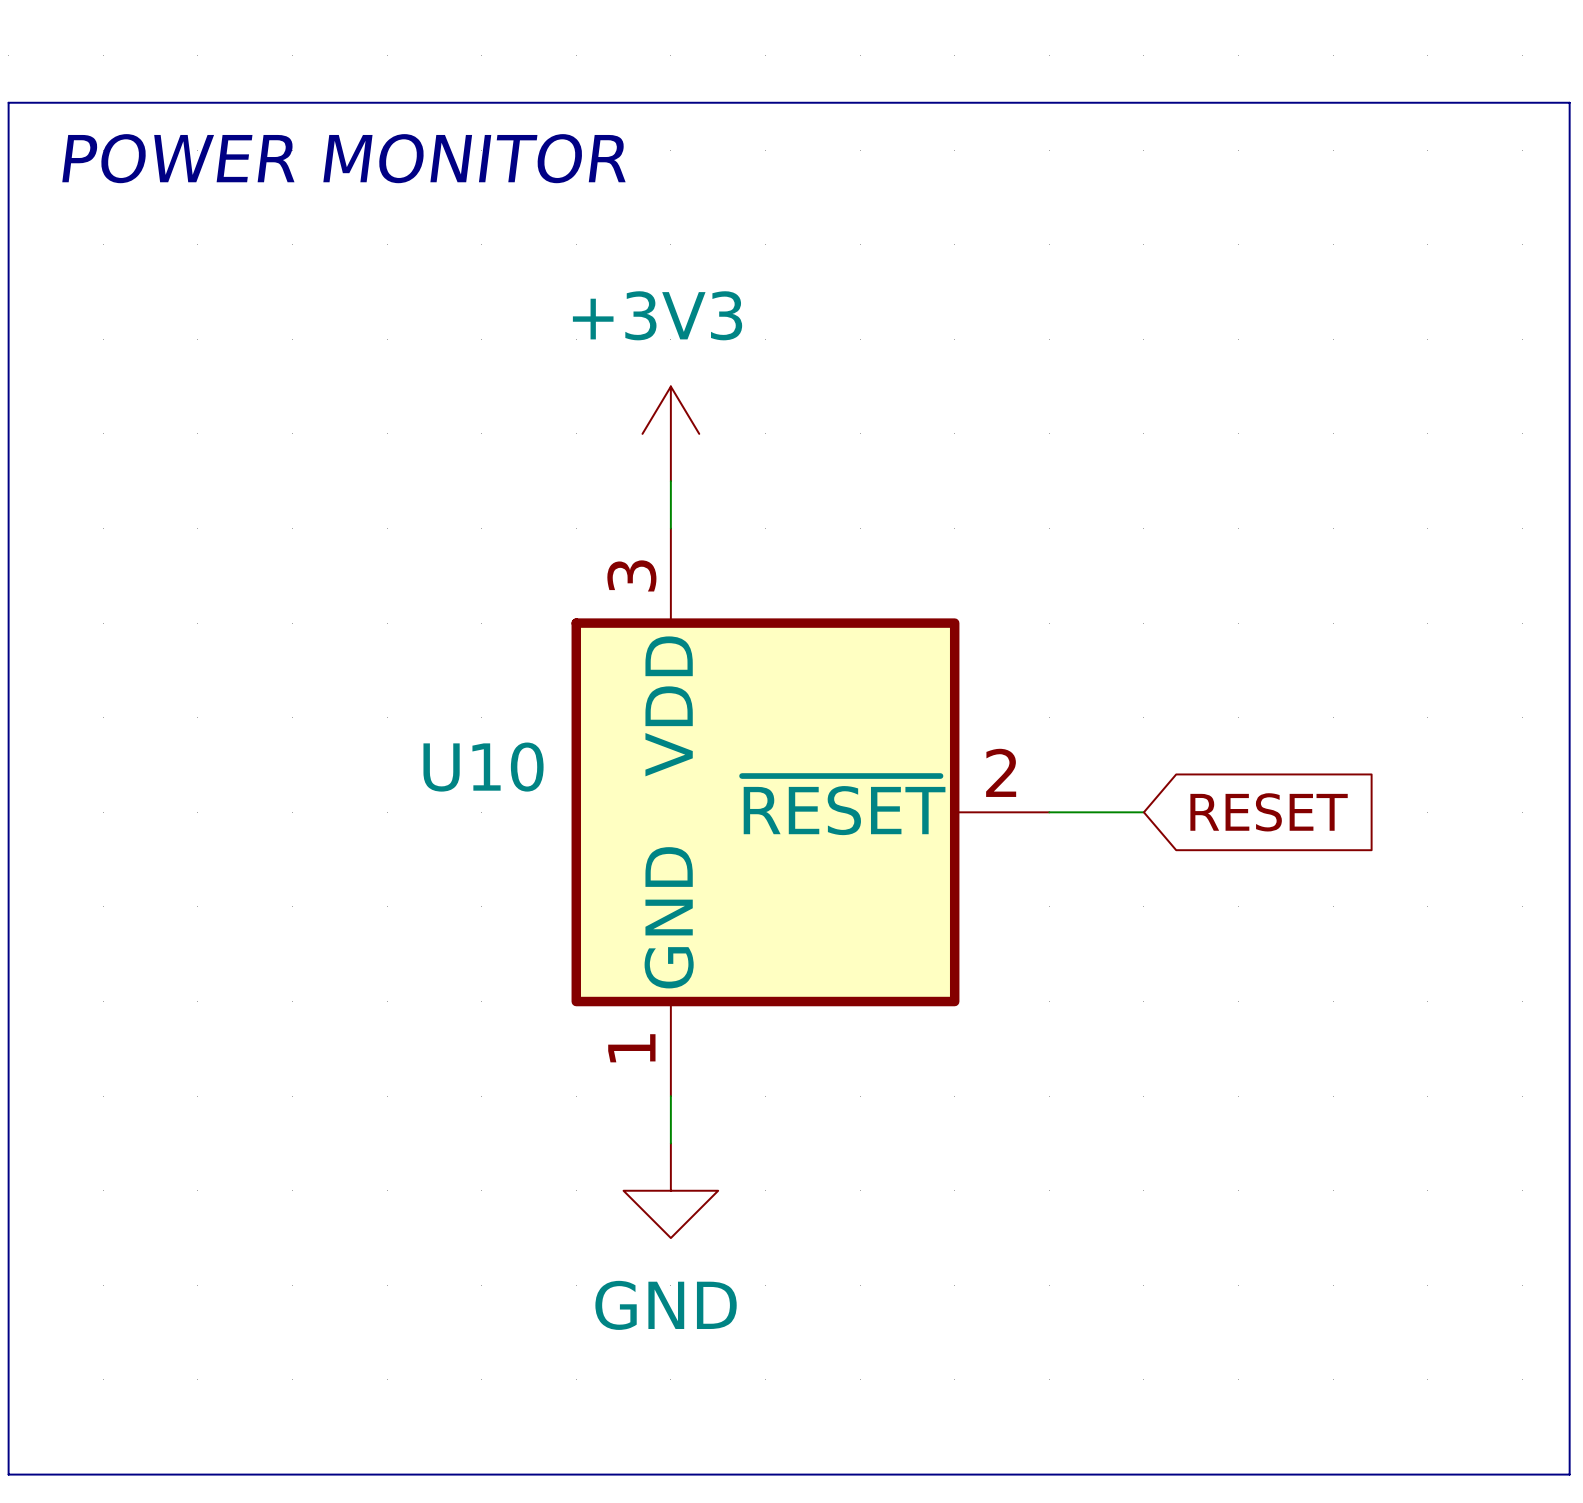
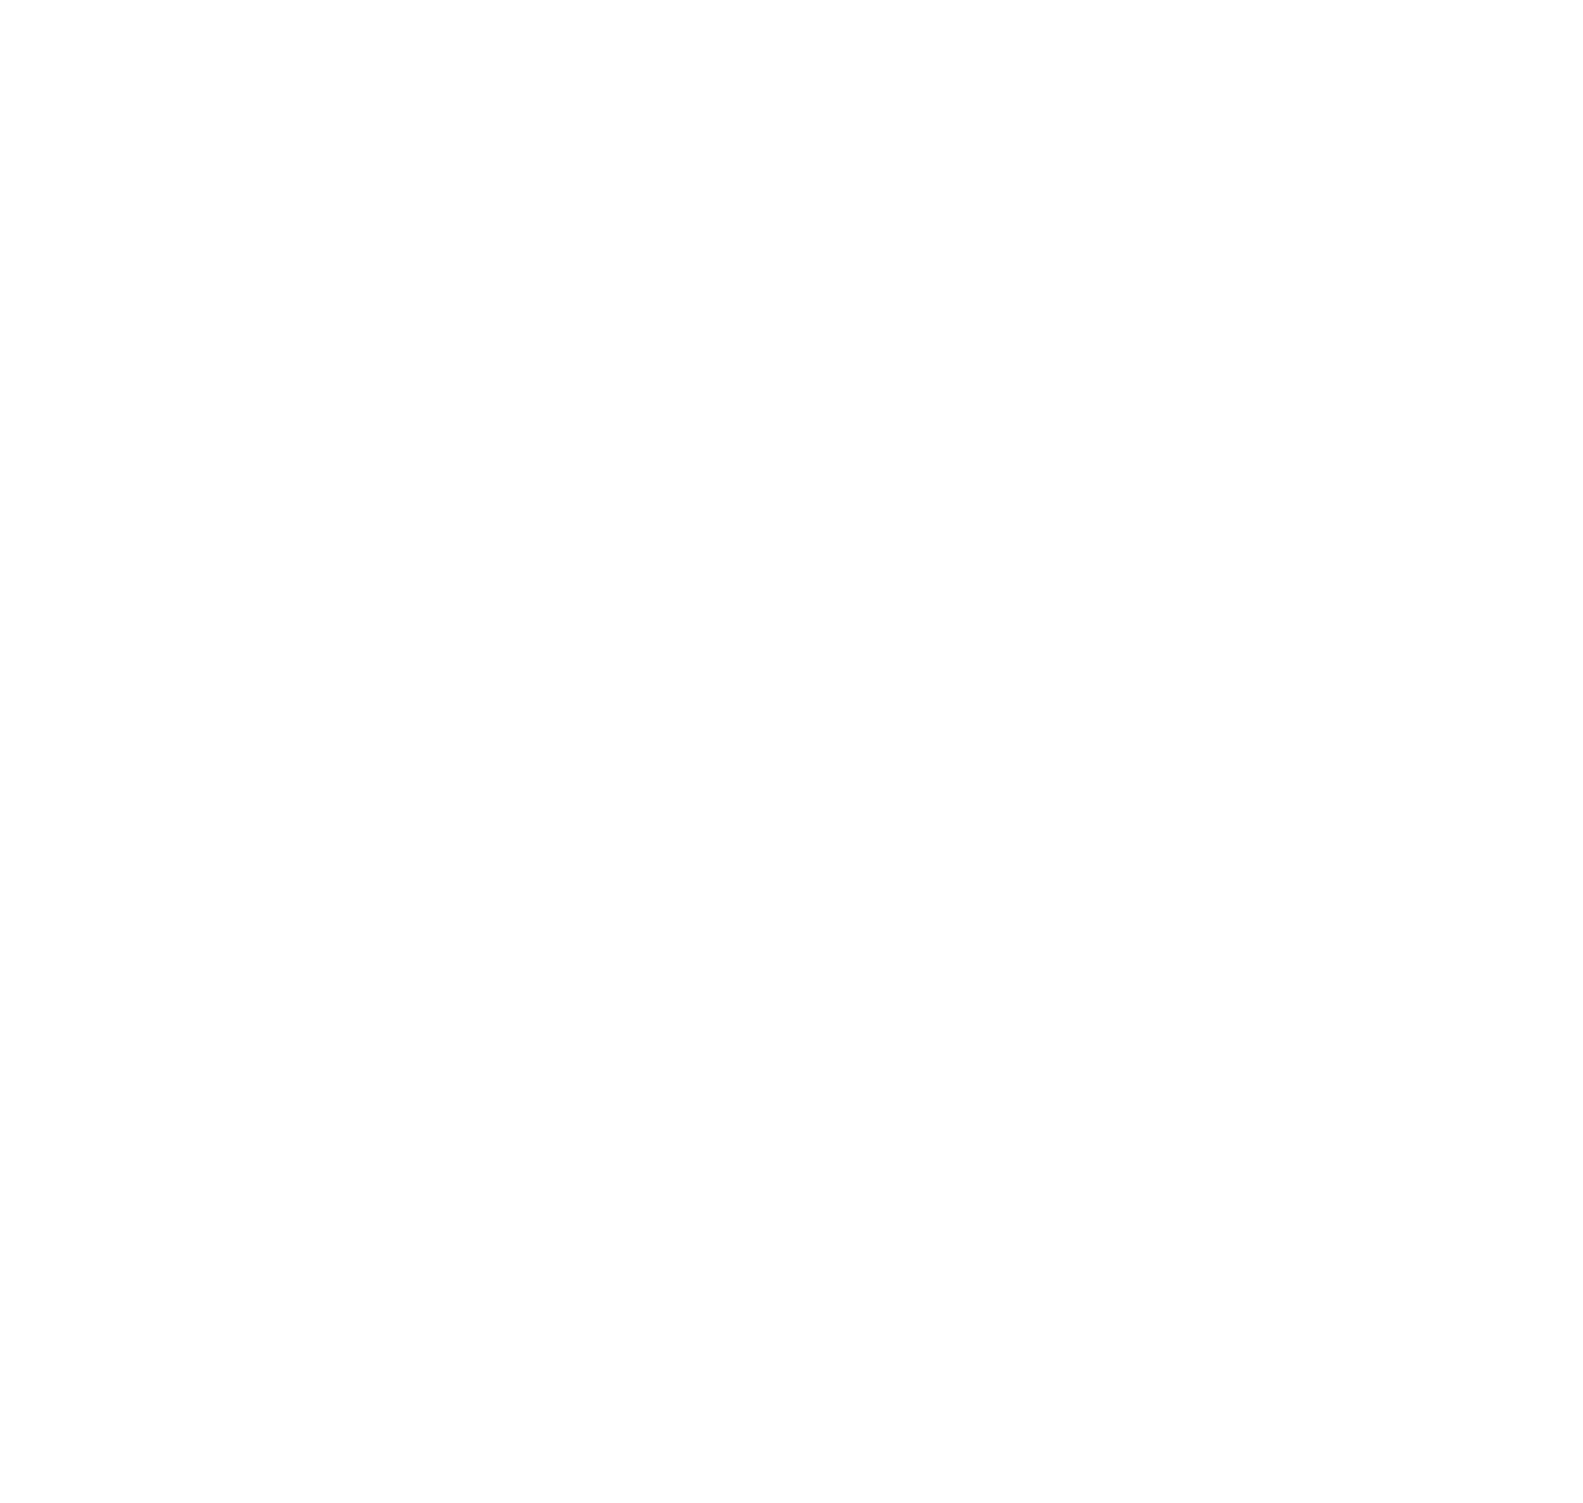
line: (8, 102) (1569, 102) (1569, 1474) (8, 1474) (8, 102) -> none
text: POWER MONITOR (343, 158) -> none
power symbol: +3V3 (670, 433) -> none
wire: (670, 481) (670, 528) -> none
U10: (810, 812) -> none
wire: (1049, 812) (1143, 812) -> none
global label: RESET (1269, 812) -> none
wire: (670, 1096) (670, 1143) -> none
power symbol: GND (670, 1190) -> none

